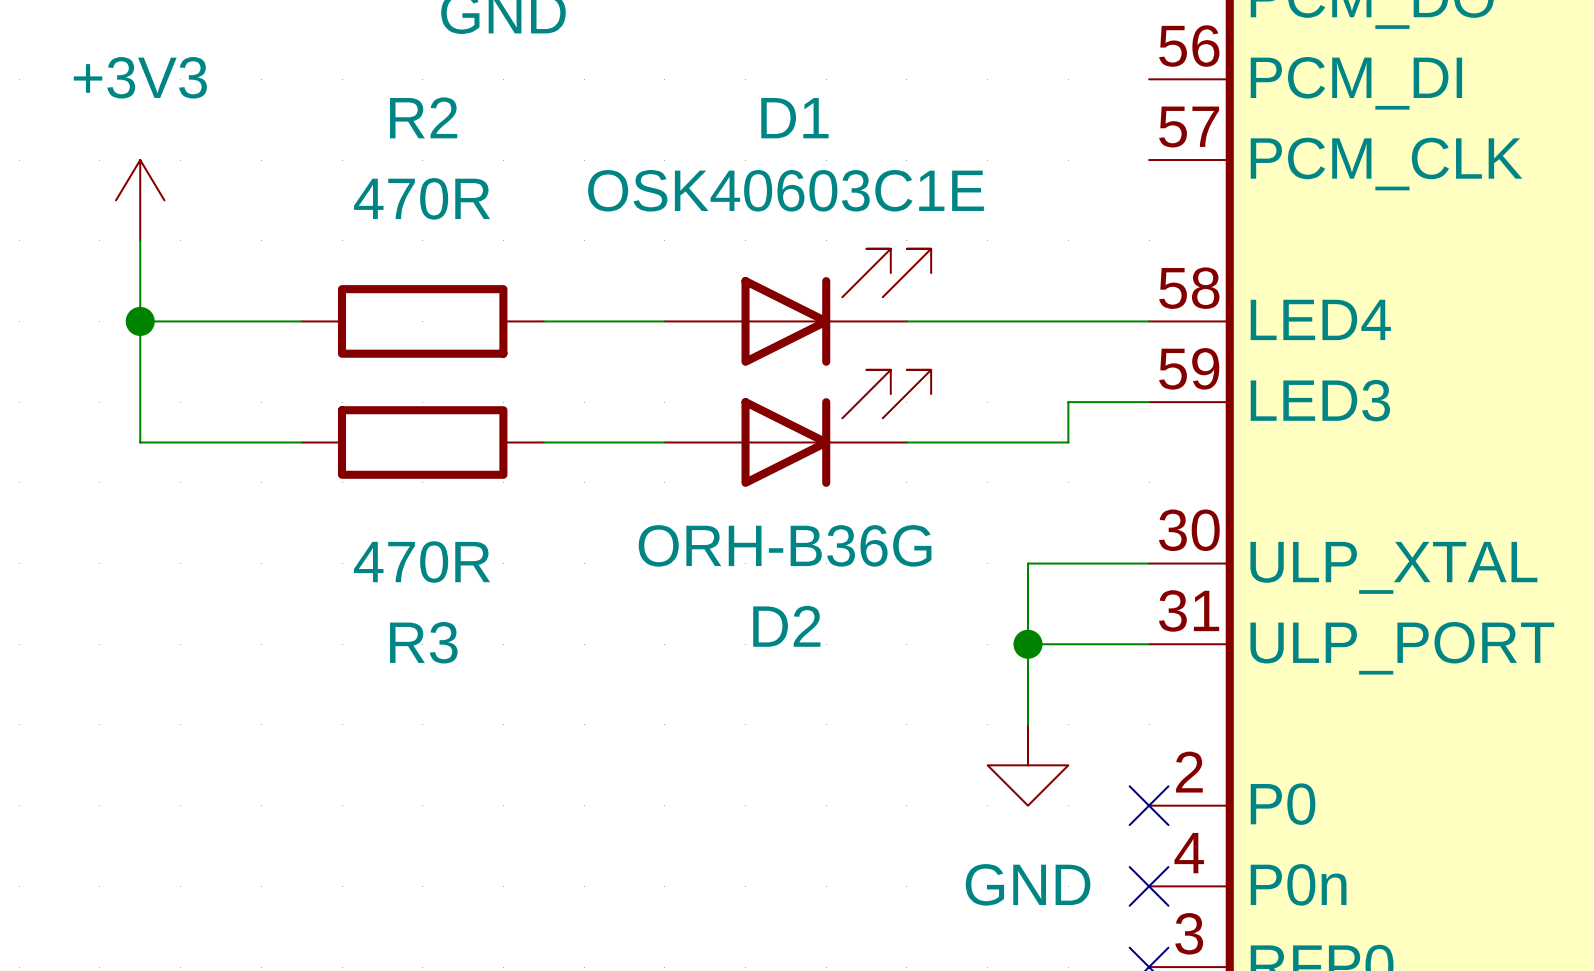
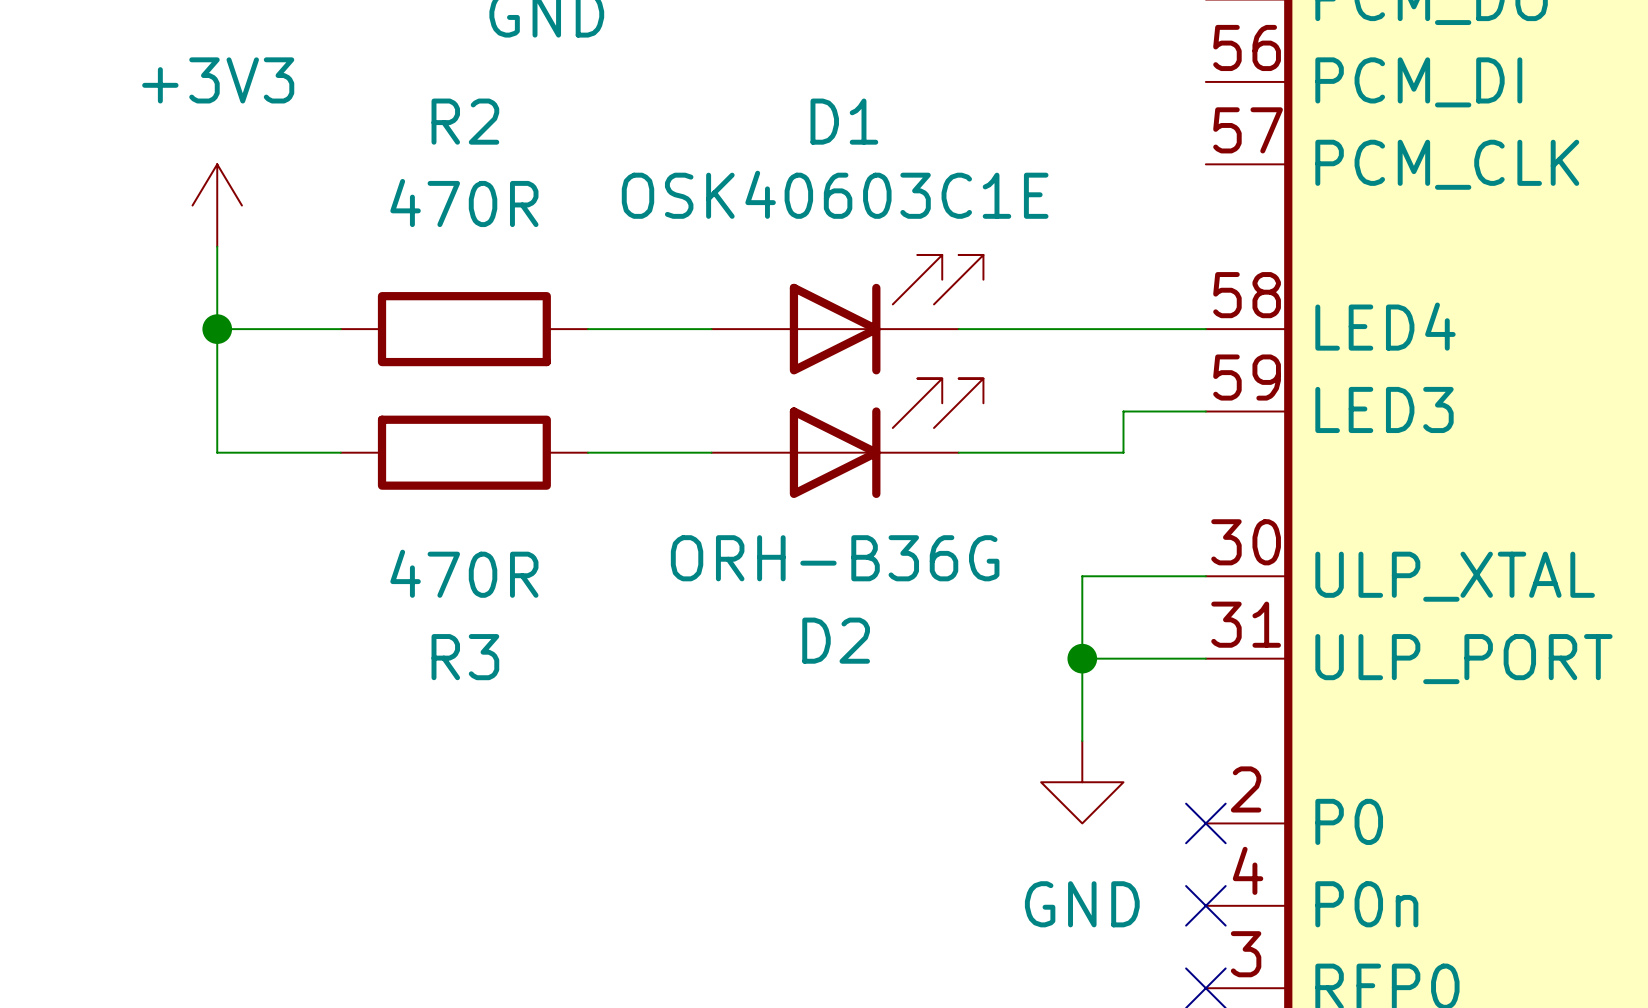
power symbol position: +3V3 (140, 200) -> +3V3 (217, 205)
wire: (140, 240) (140, 442) (180, 442) -> (217, 246) (217, 452)
wire: (140, 321) (180, 321) -> none
junction position: (140, 321) -> (217, 329)

